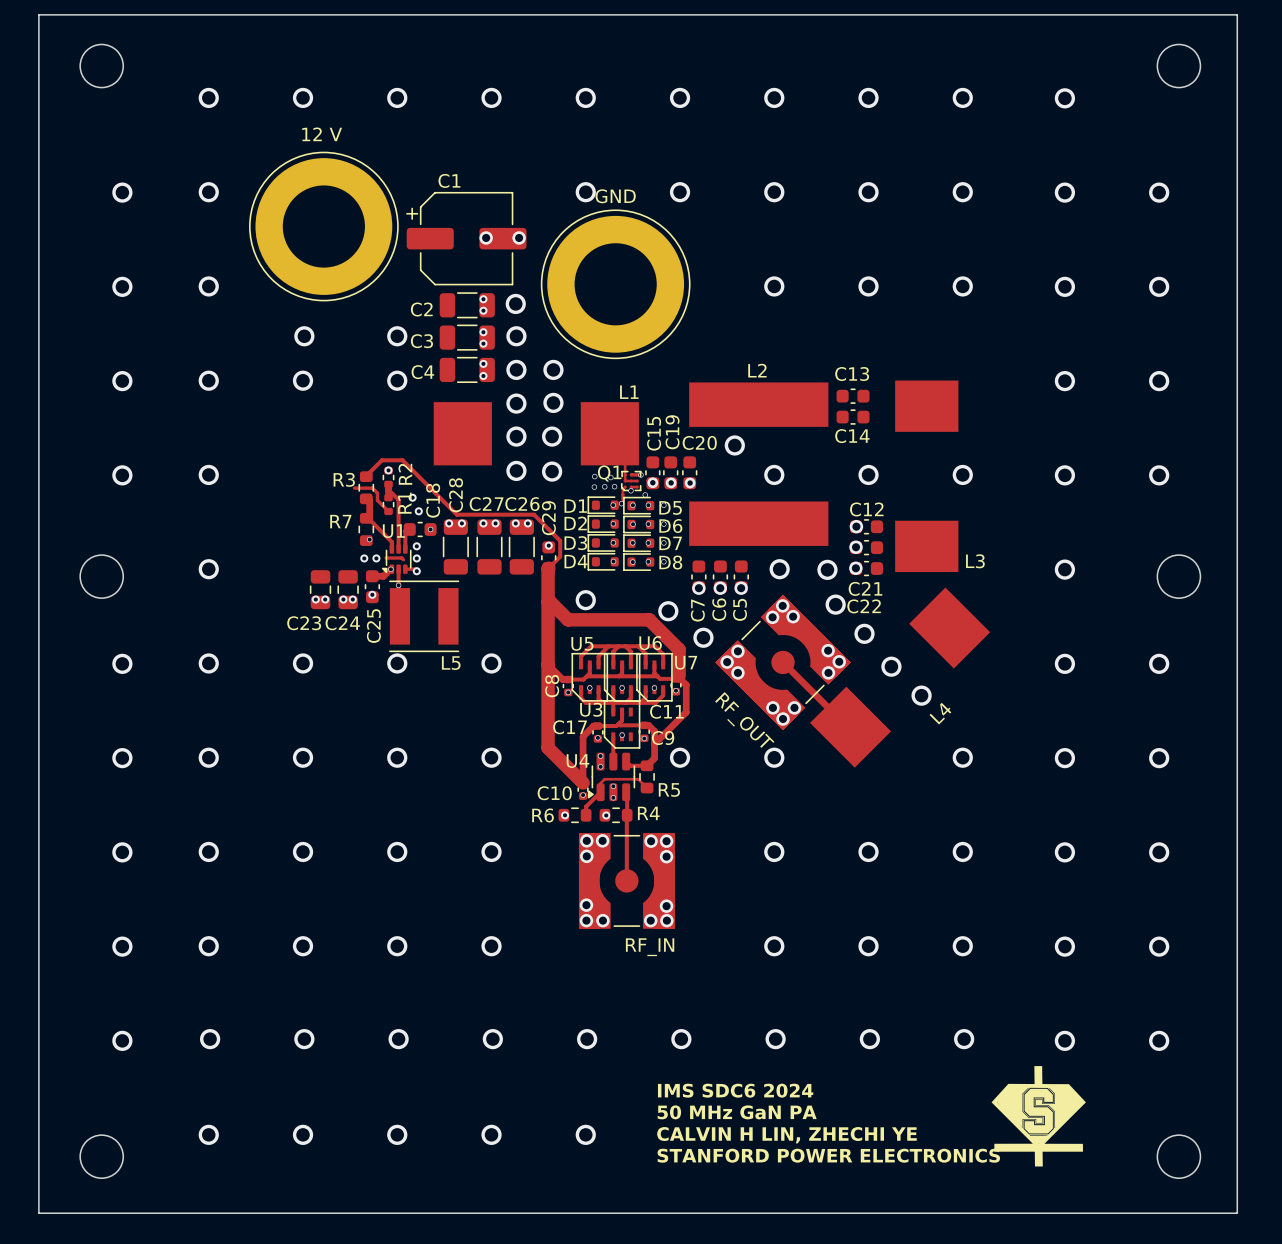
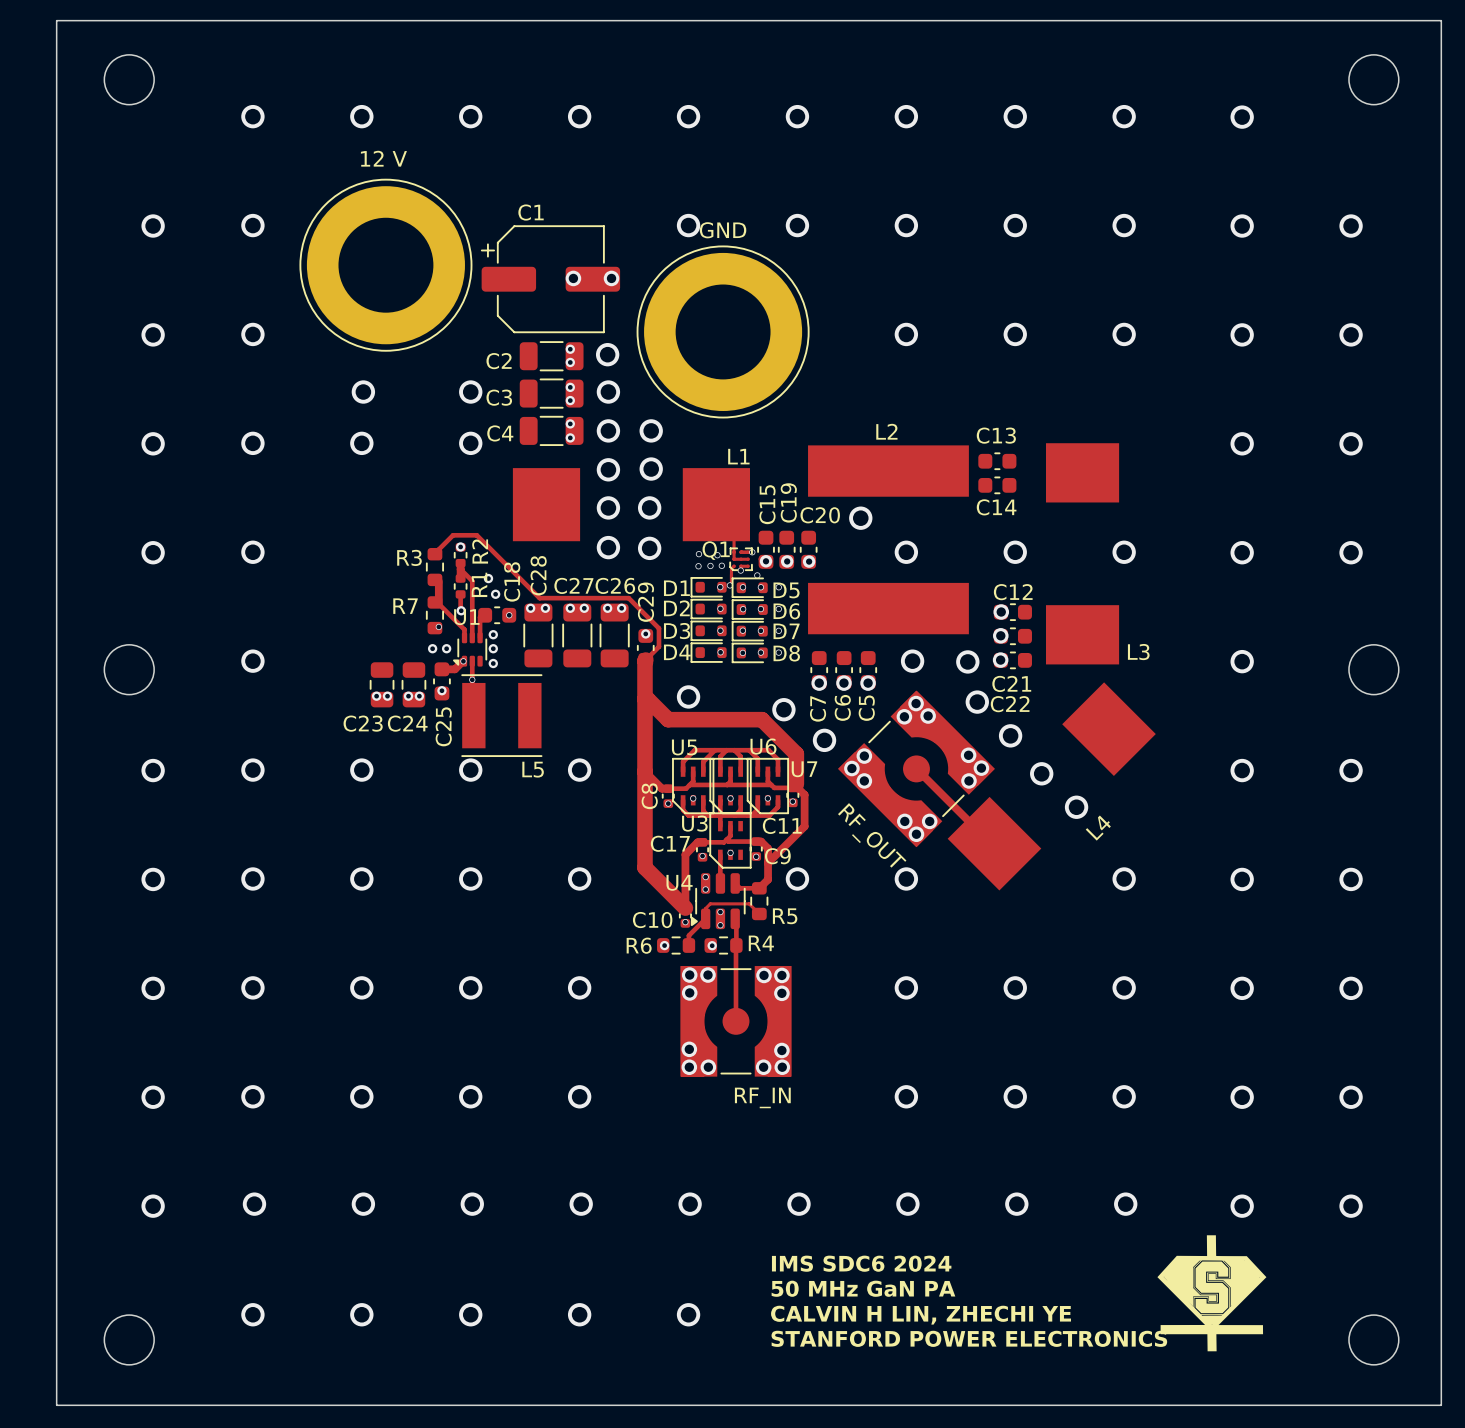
track: (354, 488) (372, 488) (377, 493) (377, 500) (388, 511) -> (461, 610) (460, 594)
via: none -> (461, 610)
track: (386, 558) (401, 558) (403, 559) -> none
track: (405, 569) (414, 569) (416, 571) -> none

